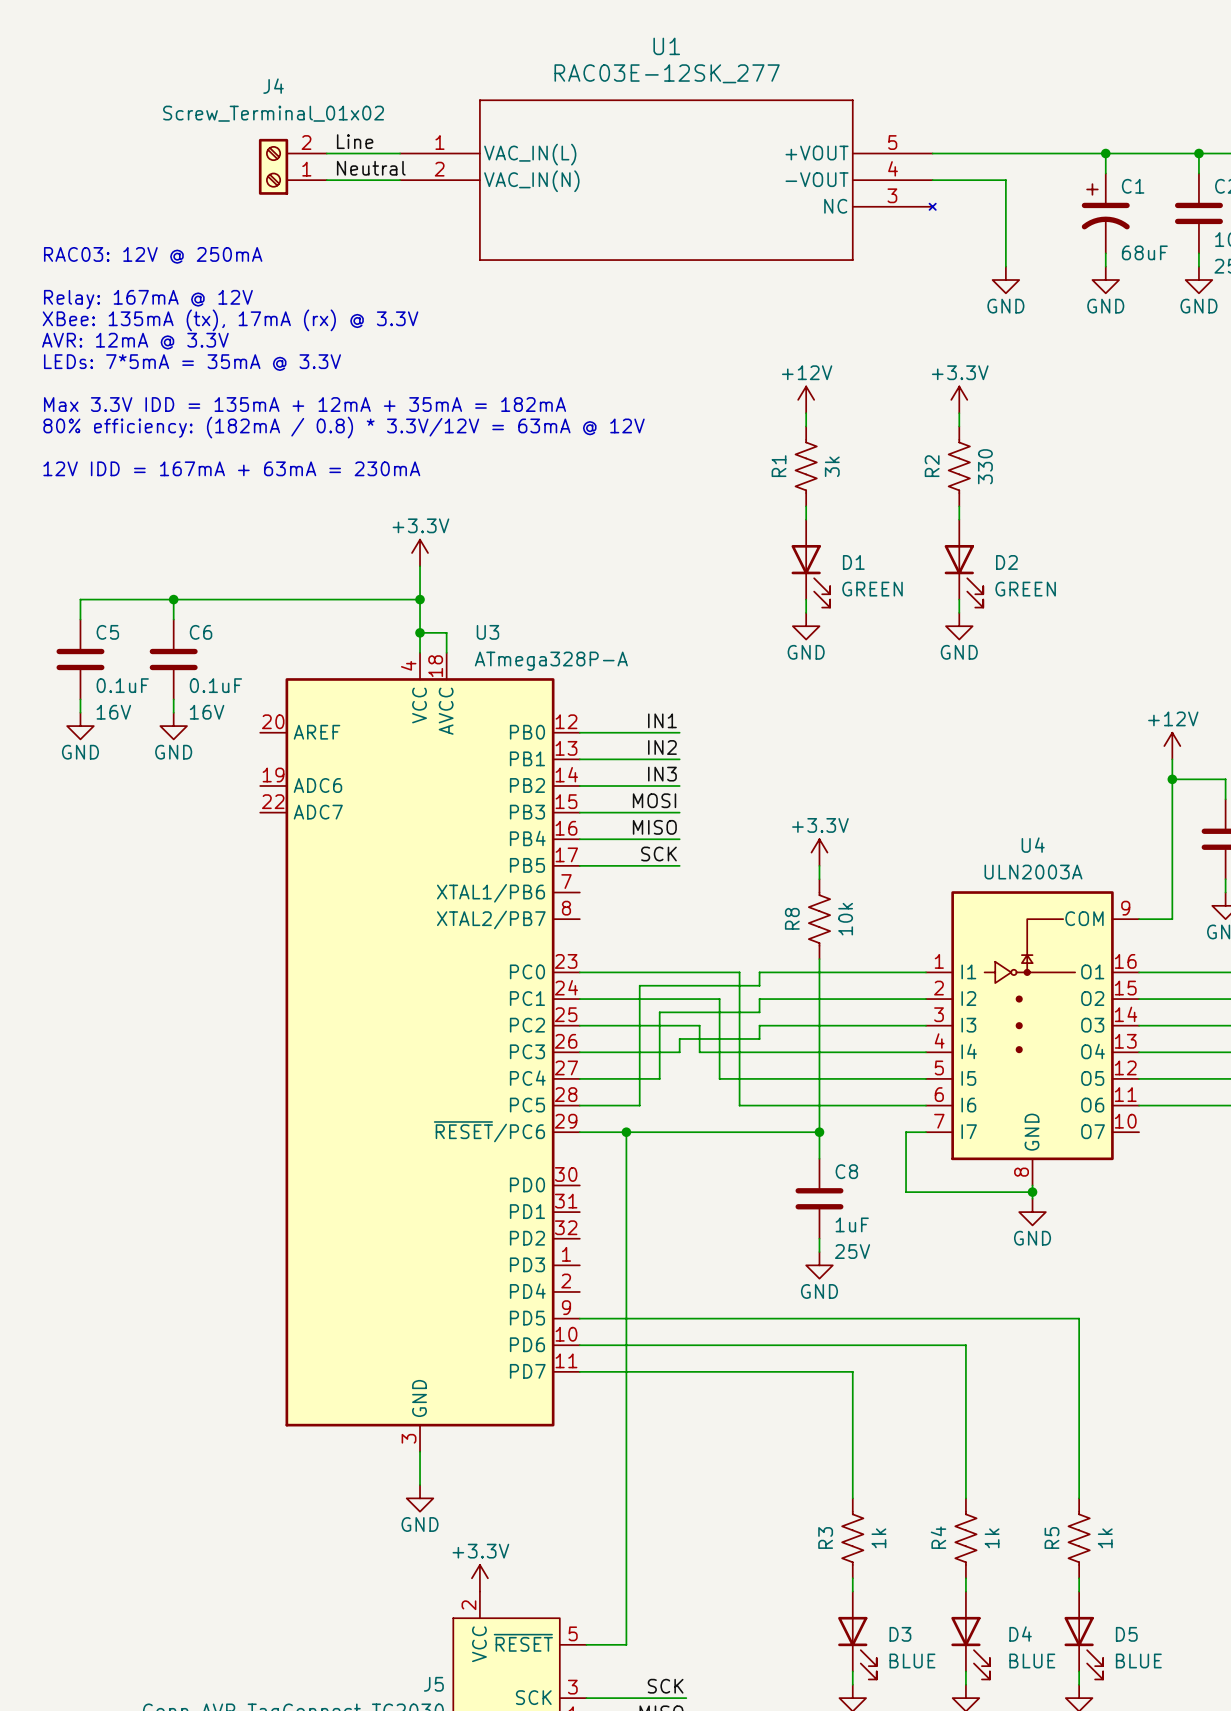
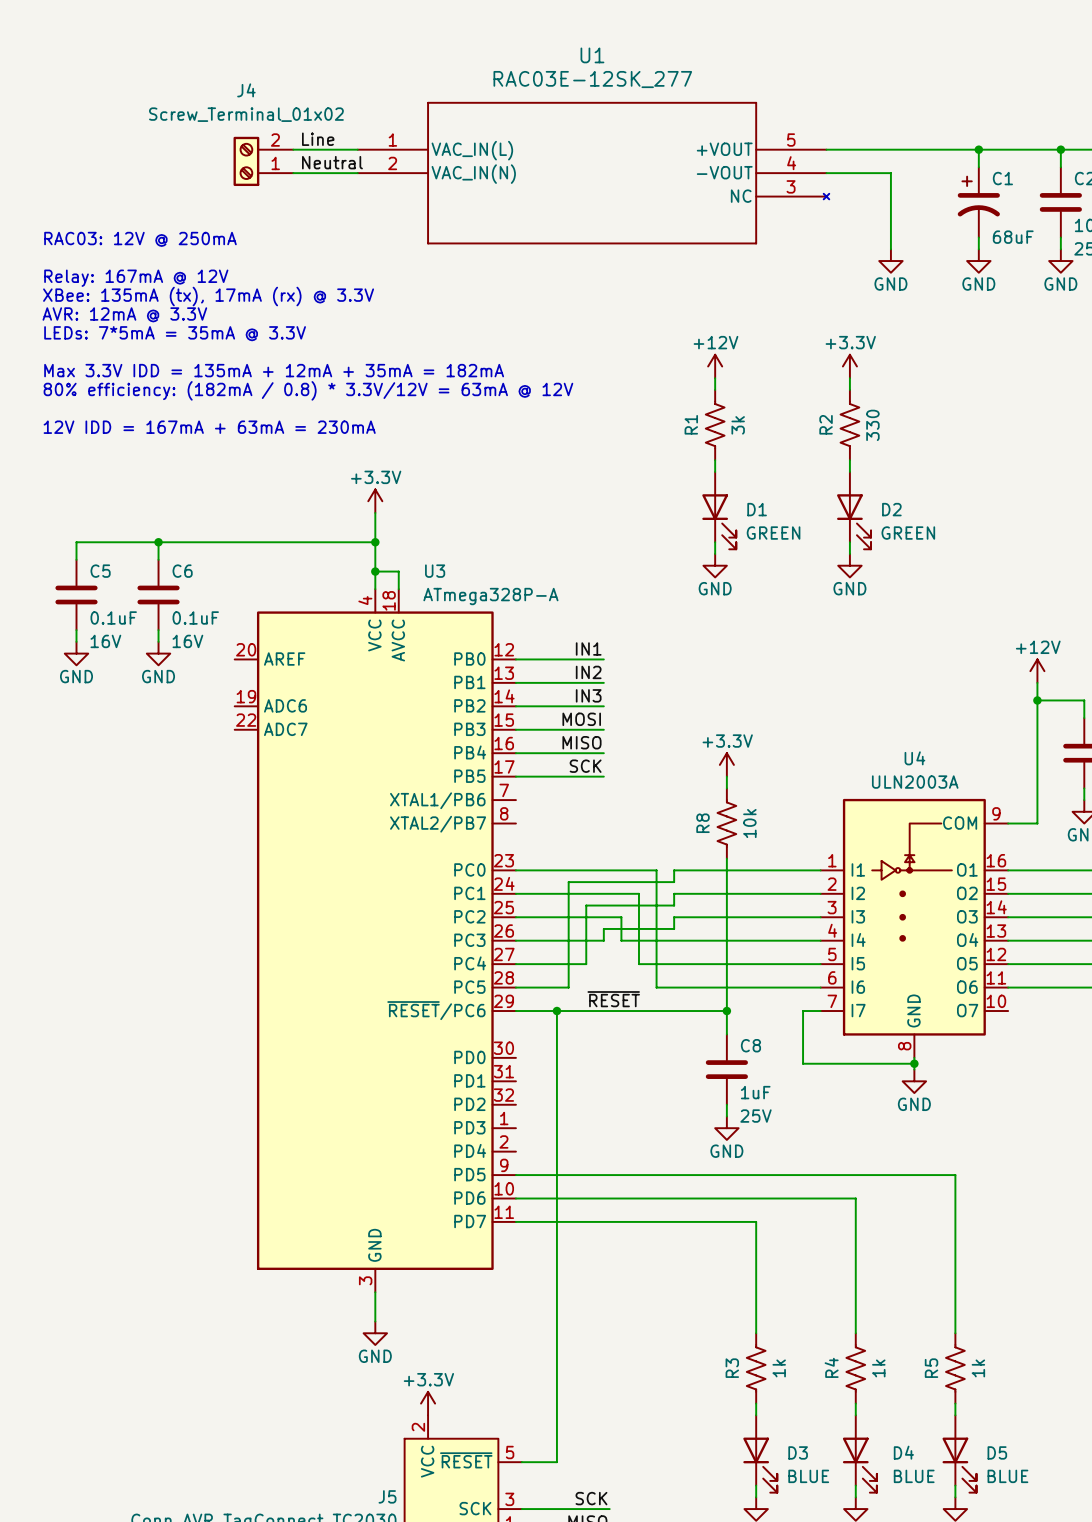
label: none -> ~{RESET} (613, 999)

